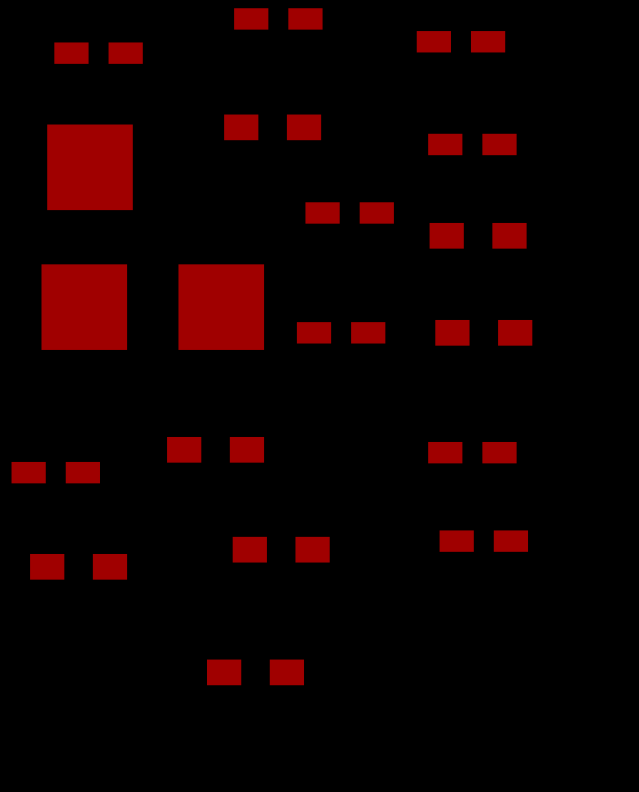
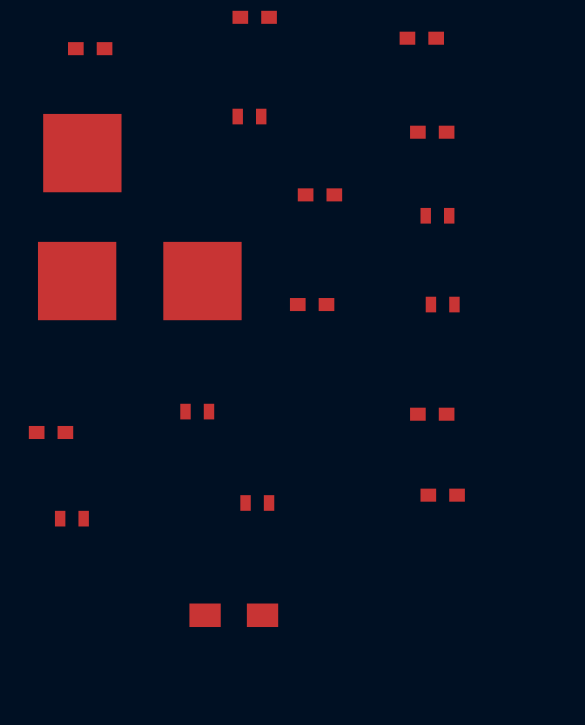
part footprint: [234, 8, 323, 30] -> [232, 10, 277, 24]
part footprint: [416, 31, 506, 53] -> [399, 31, 444, 45]
part footprint: [54, 42, 143, 64] -> [67, 42, 113, 56]
part footprint: [224, 114, 322, 141] -> [232, 108, 267, 125]
part footprint: [428, 133, 517, 156] -> [410, 125, 455, 139]
part footprint: [305, 202, 394, 224] -> [297, 188, 343, 202]
part footprint: [429, 222, 527, 249] -> [420, 207, 455, 224]
part footprint: [435, 319, 533, 346] -> [425, 296, 460, 313]
part footprint: [296, 322, 386, 344] -> [289, 298, 335, 312]
part footprint: [167, 436, 265, 463] -> [180, 403, 215, 420]
part footprint: [428, 441, 517, 464] -> [410, 407, 455, 421]
part footprint: [11, 461, 100, 484] -> [28, 425, 74, 440]
part footprint: [439, 530, 529, 552] -> [420, 488, 465, 502]
part footprint: [232, 536, 330, 563] -> [240, 495, 275, 511]
part footprint: [30, 553, 128, 580] -> [54, 510, 89, 527]

